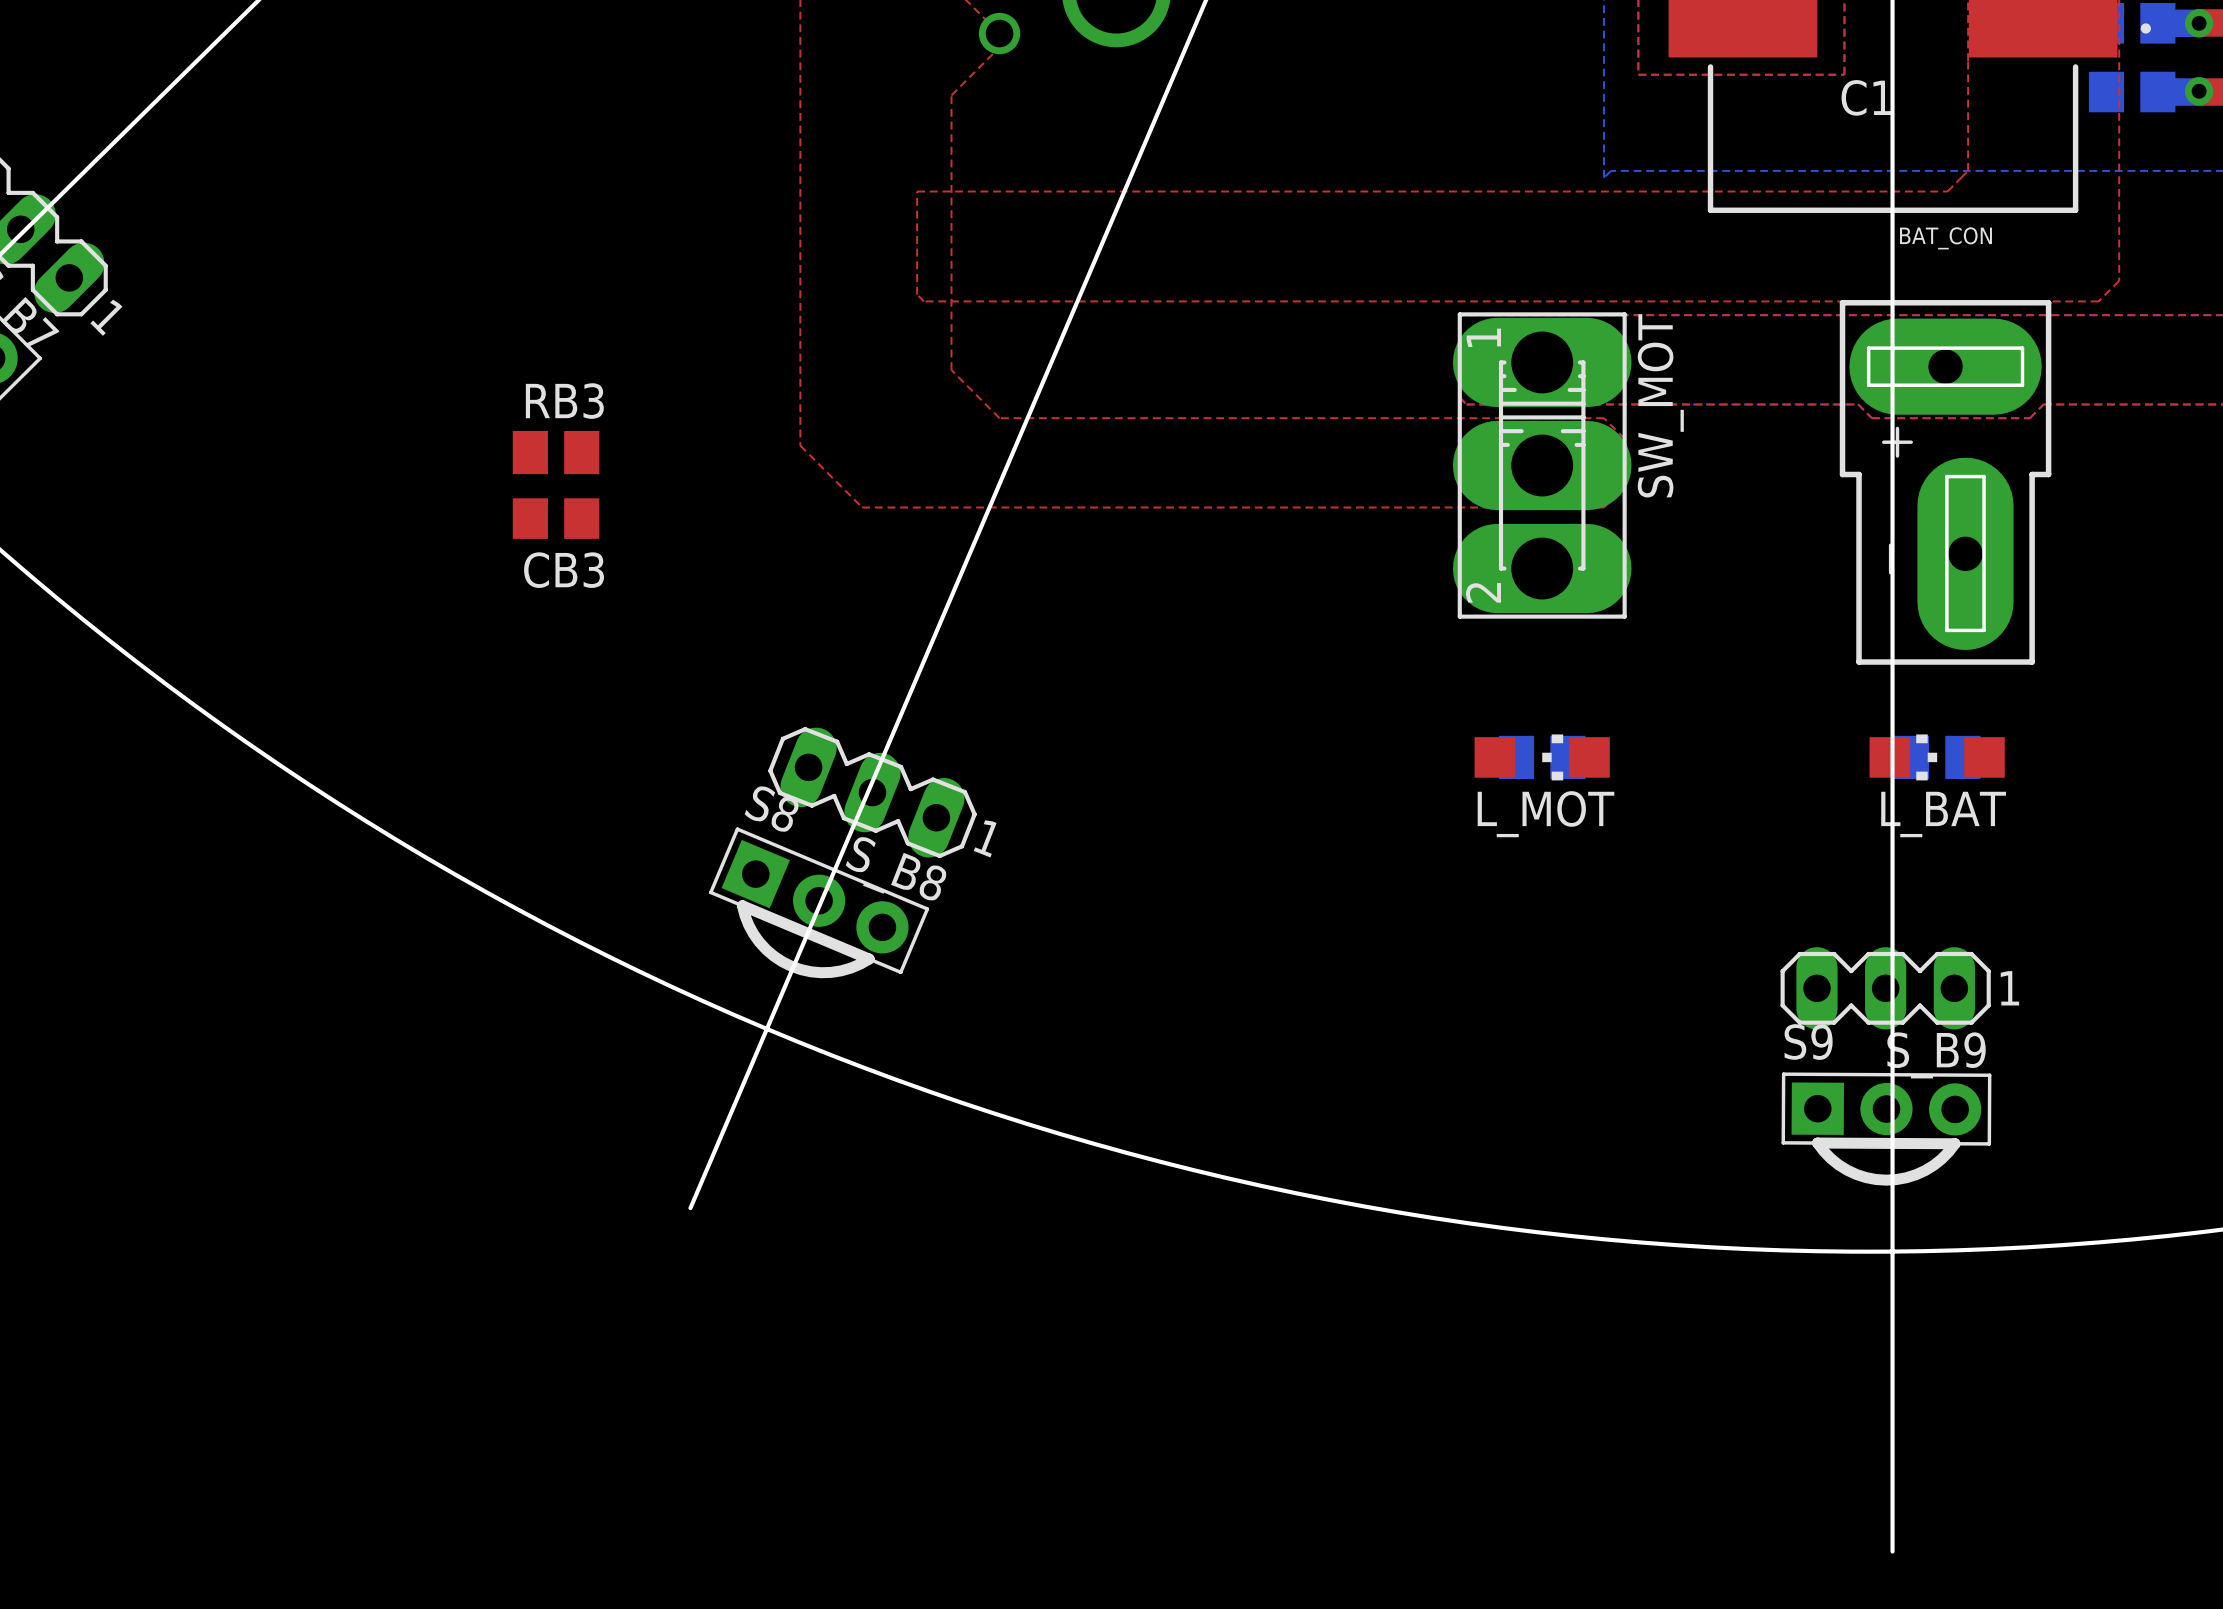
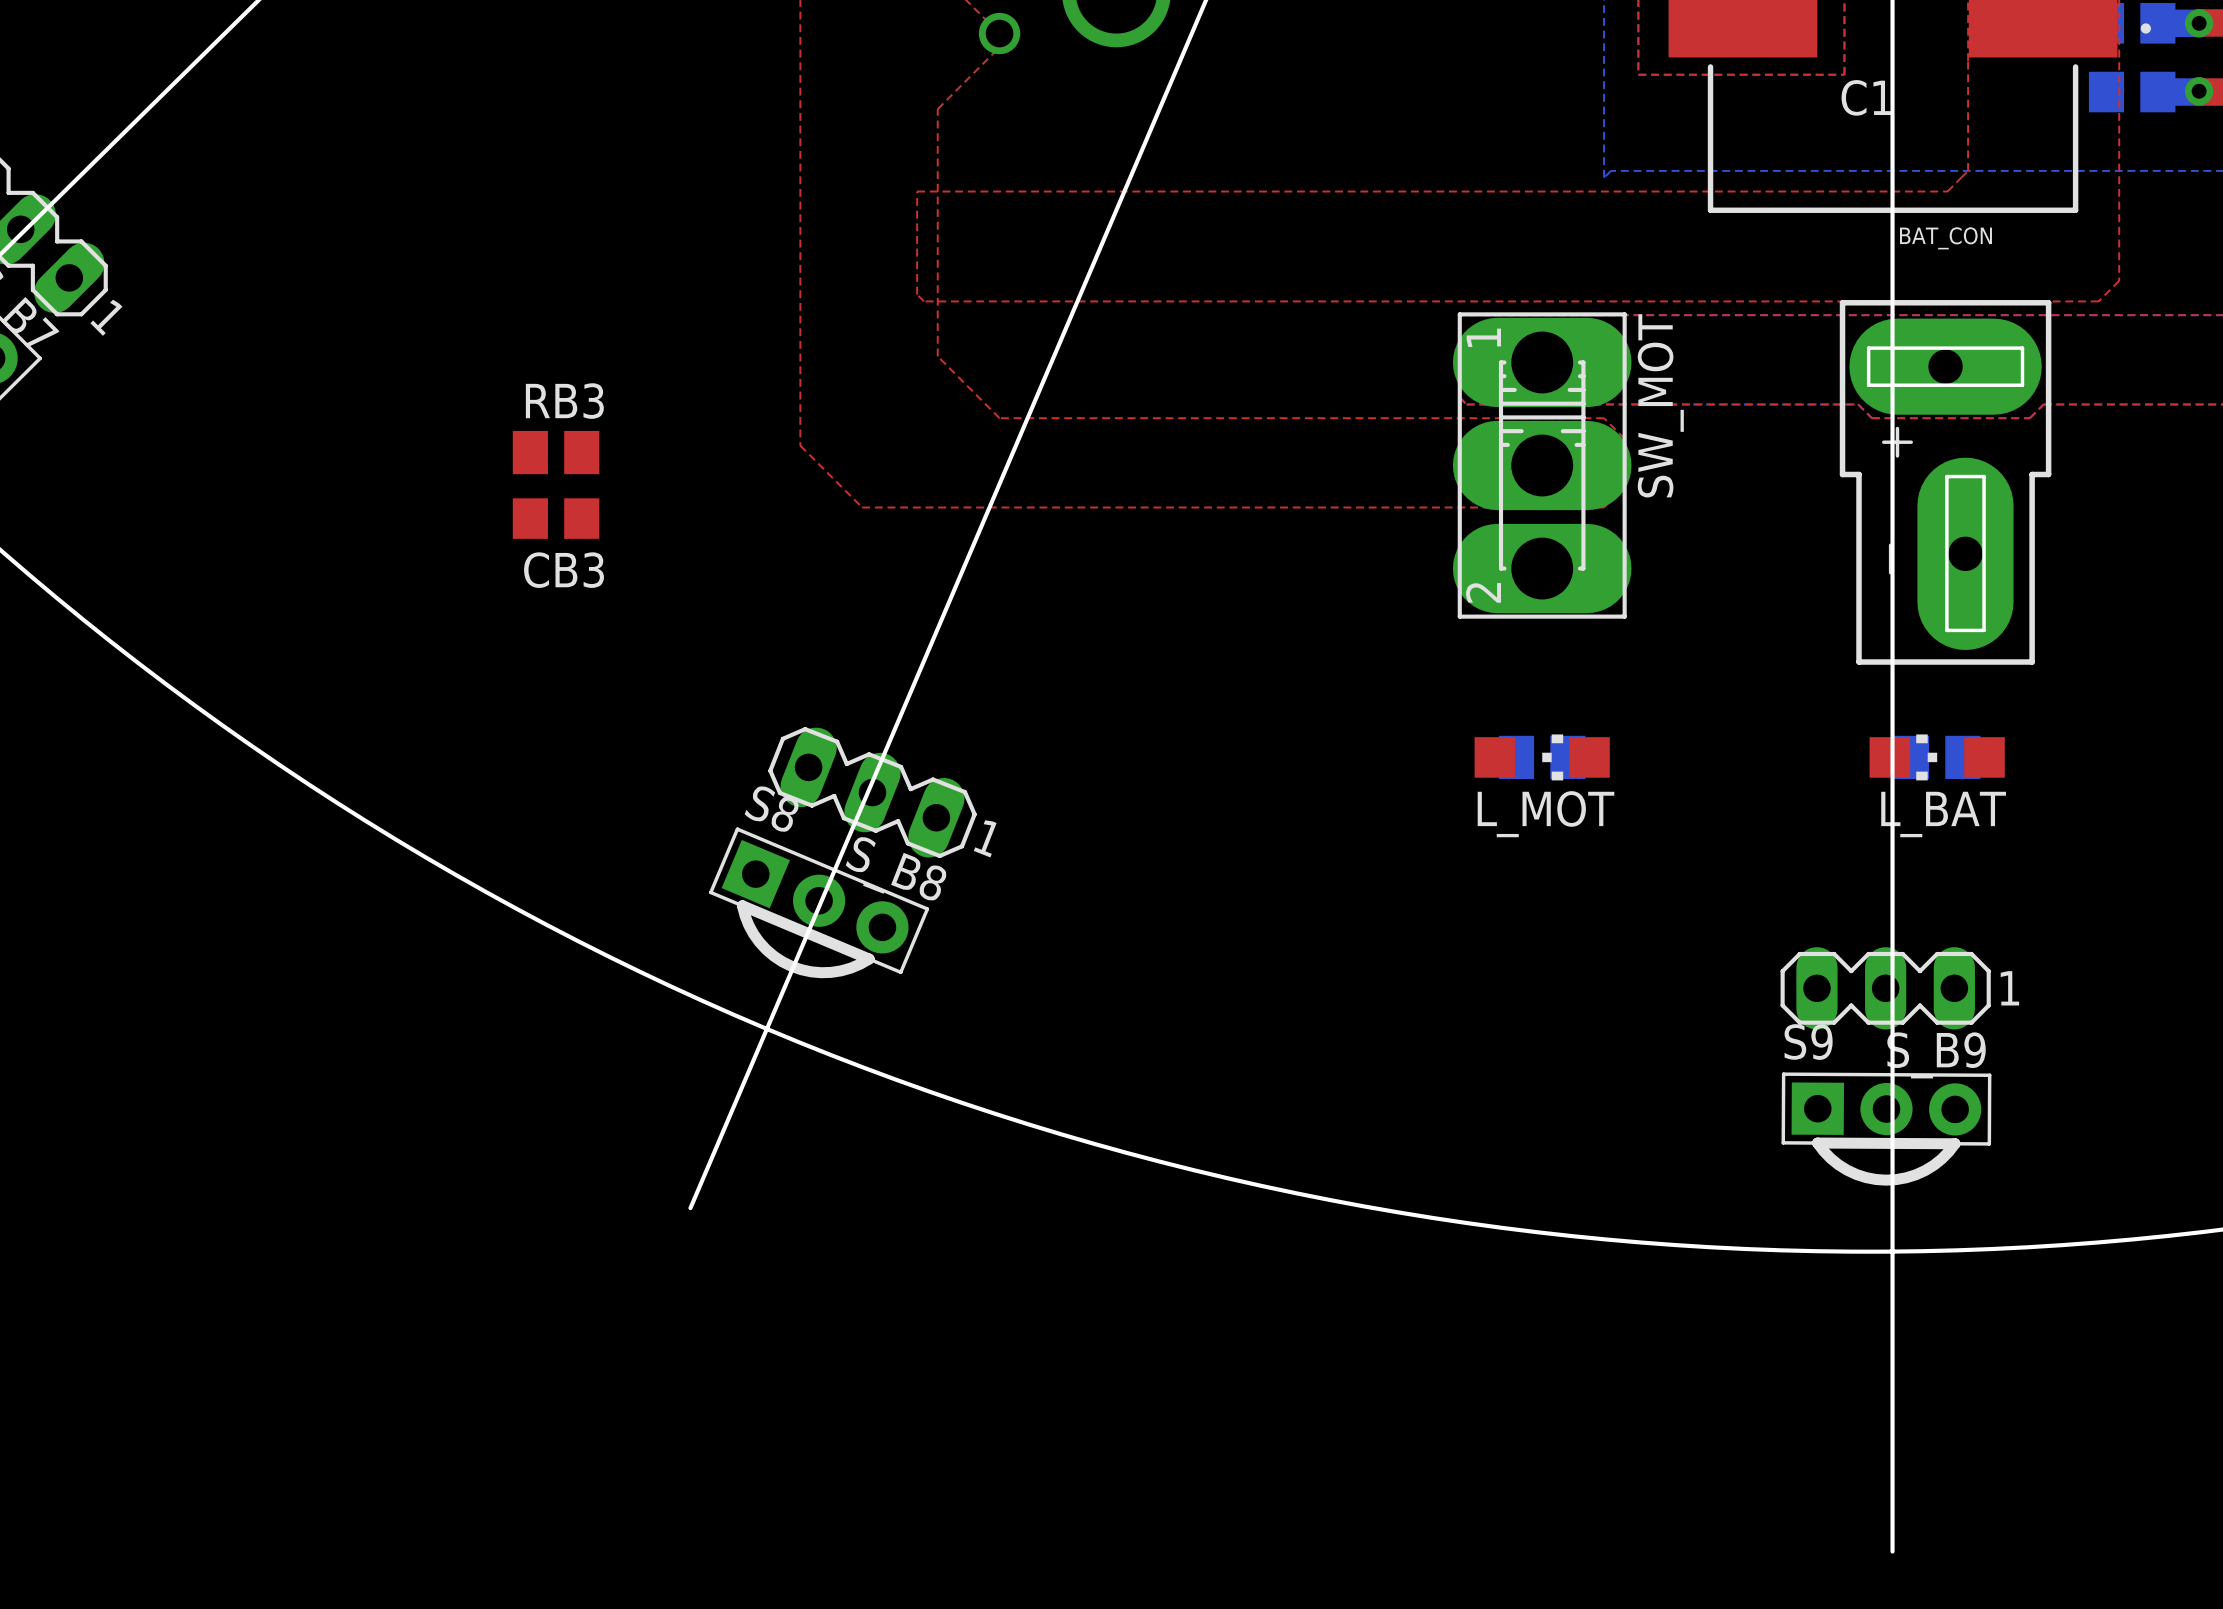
top zone outline: (951, 95) (951, 370) -> (951, 95) (937, 109) (937, 356) (951, 370)

